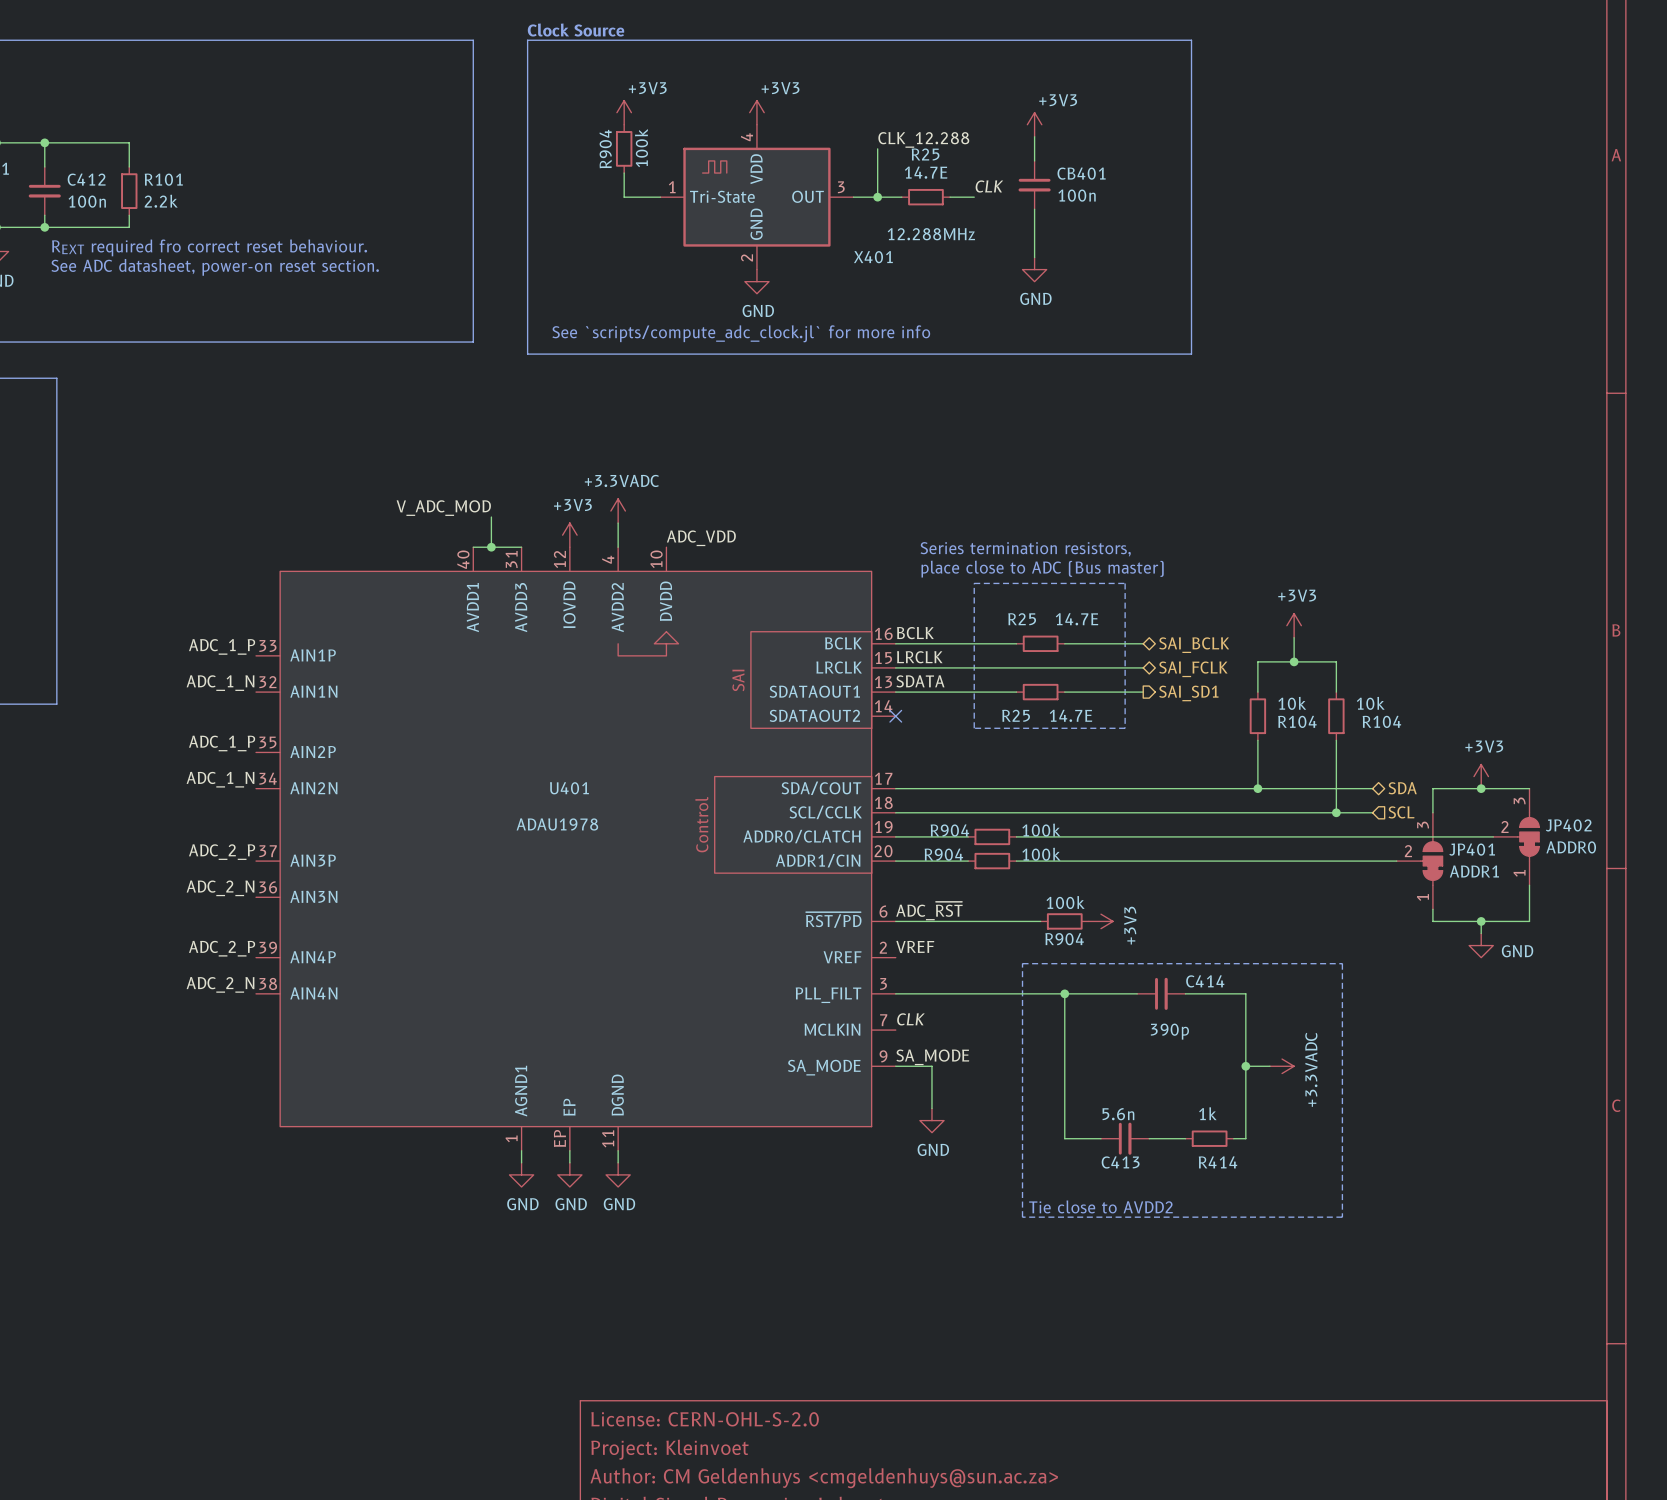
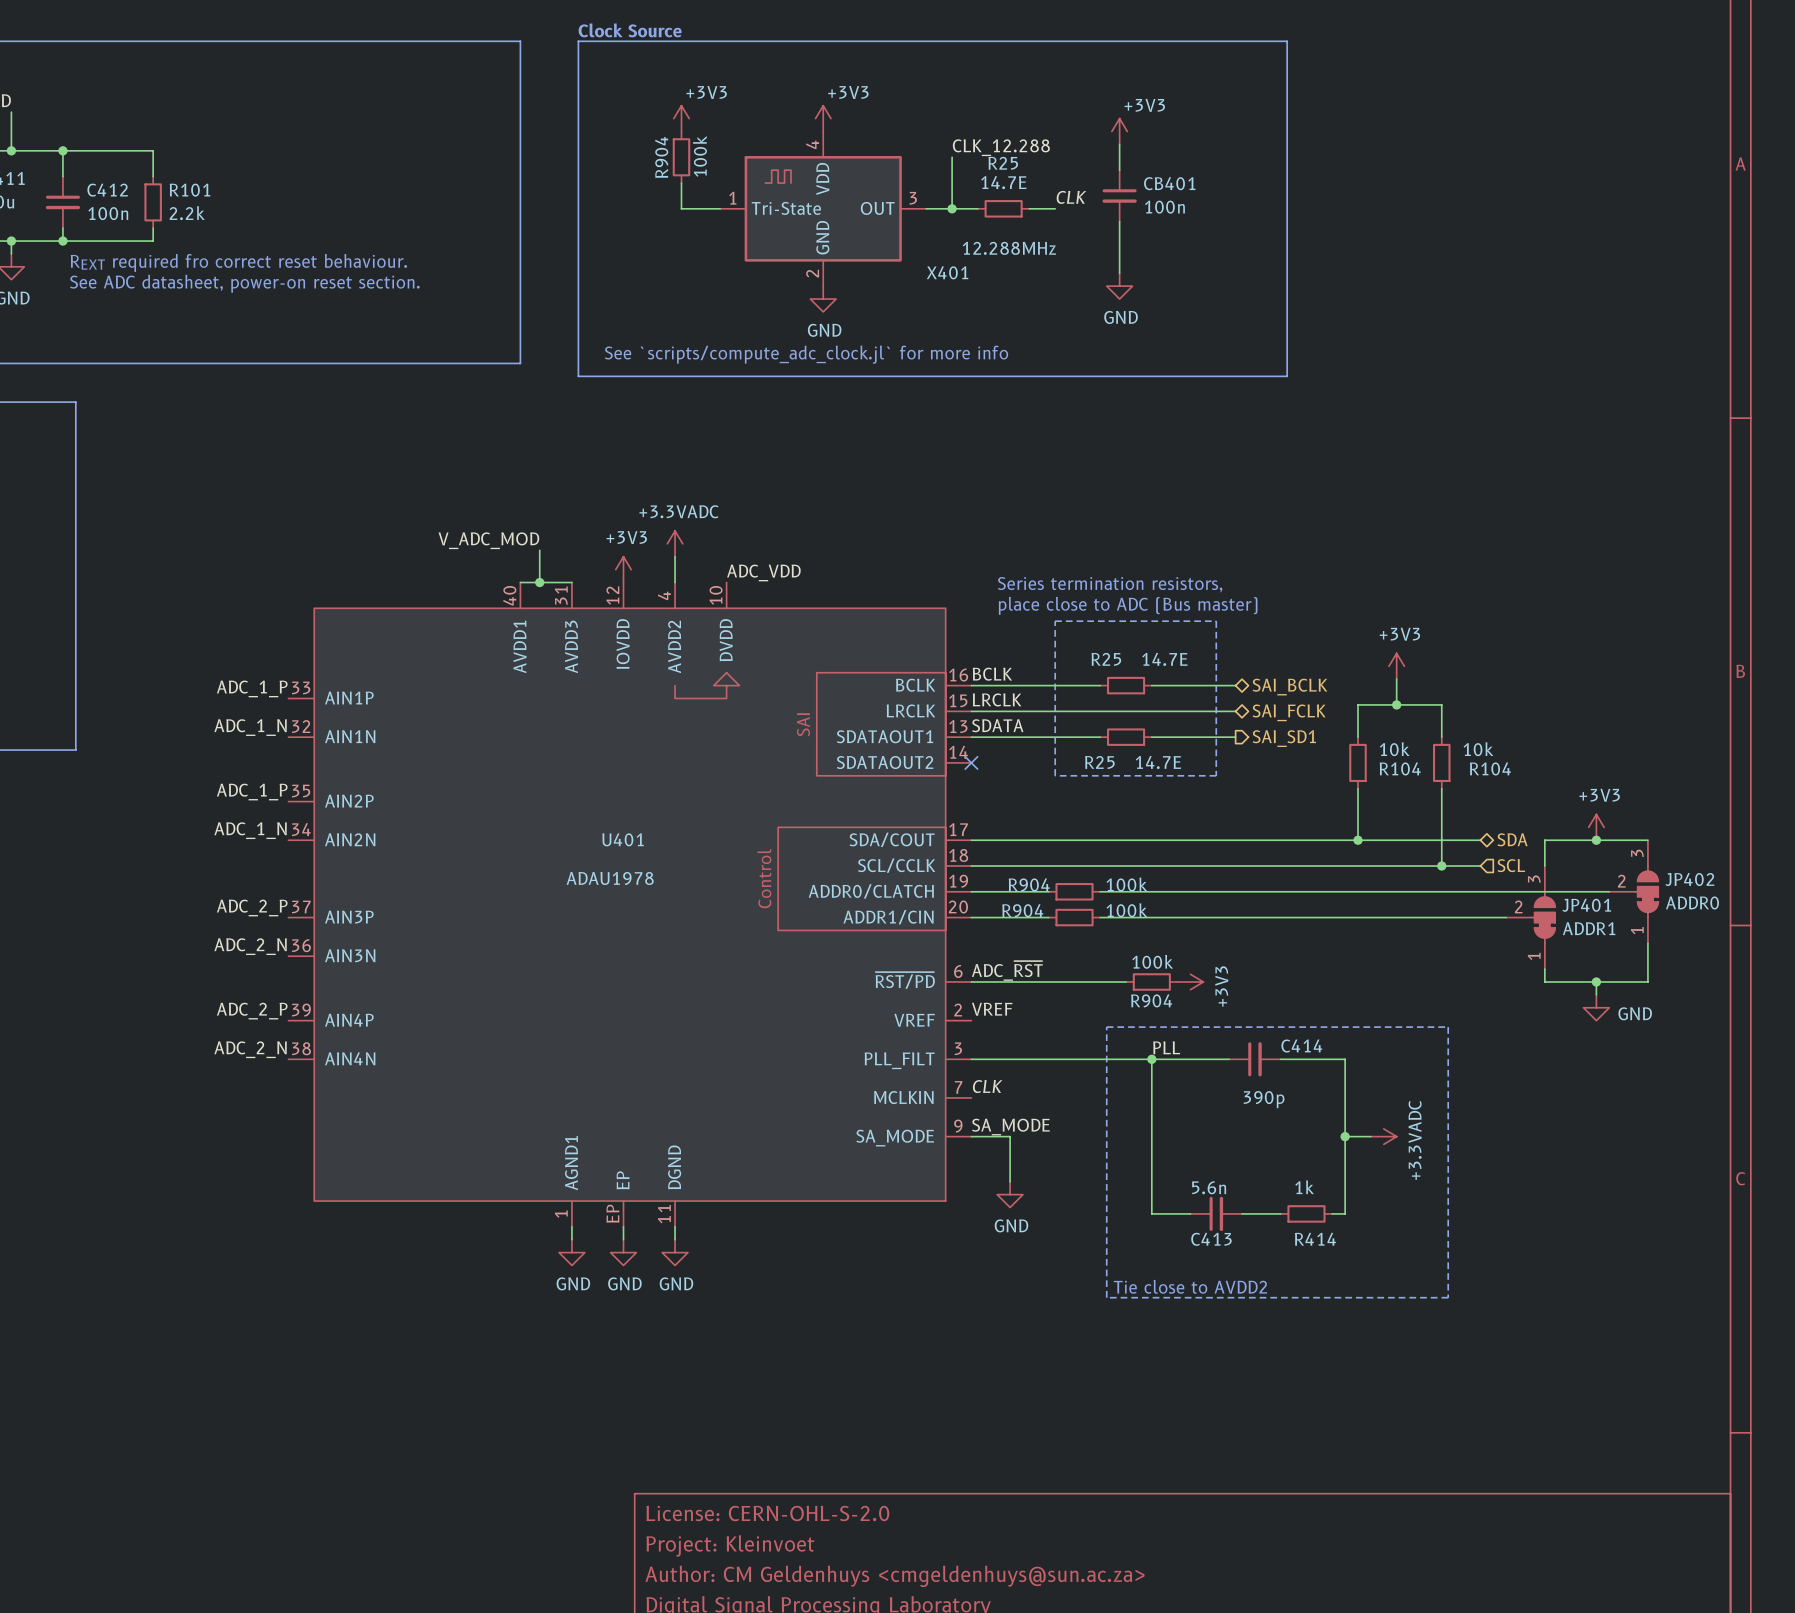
label: none -> PLL (1166, 1047)

